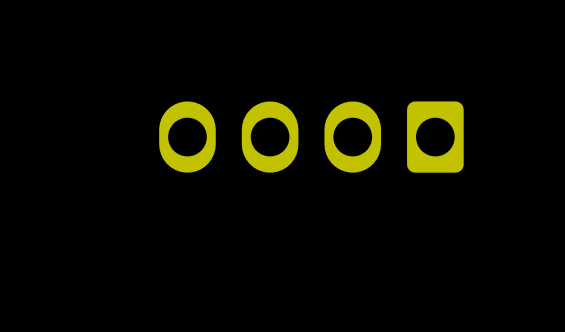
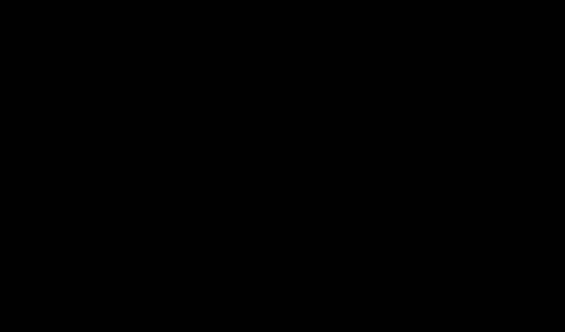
part: (311, 137) -> none

